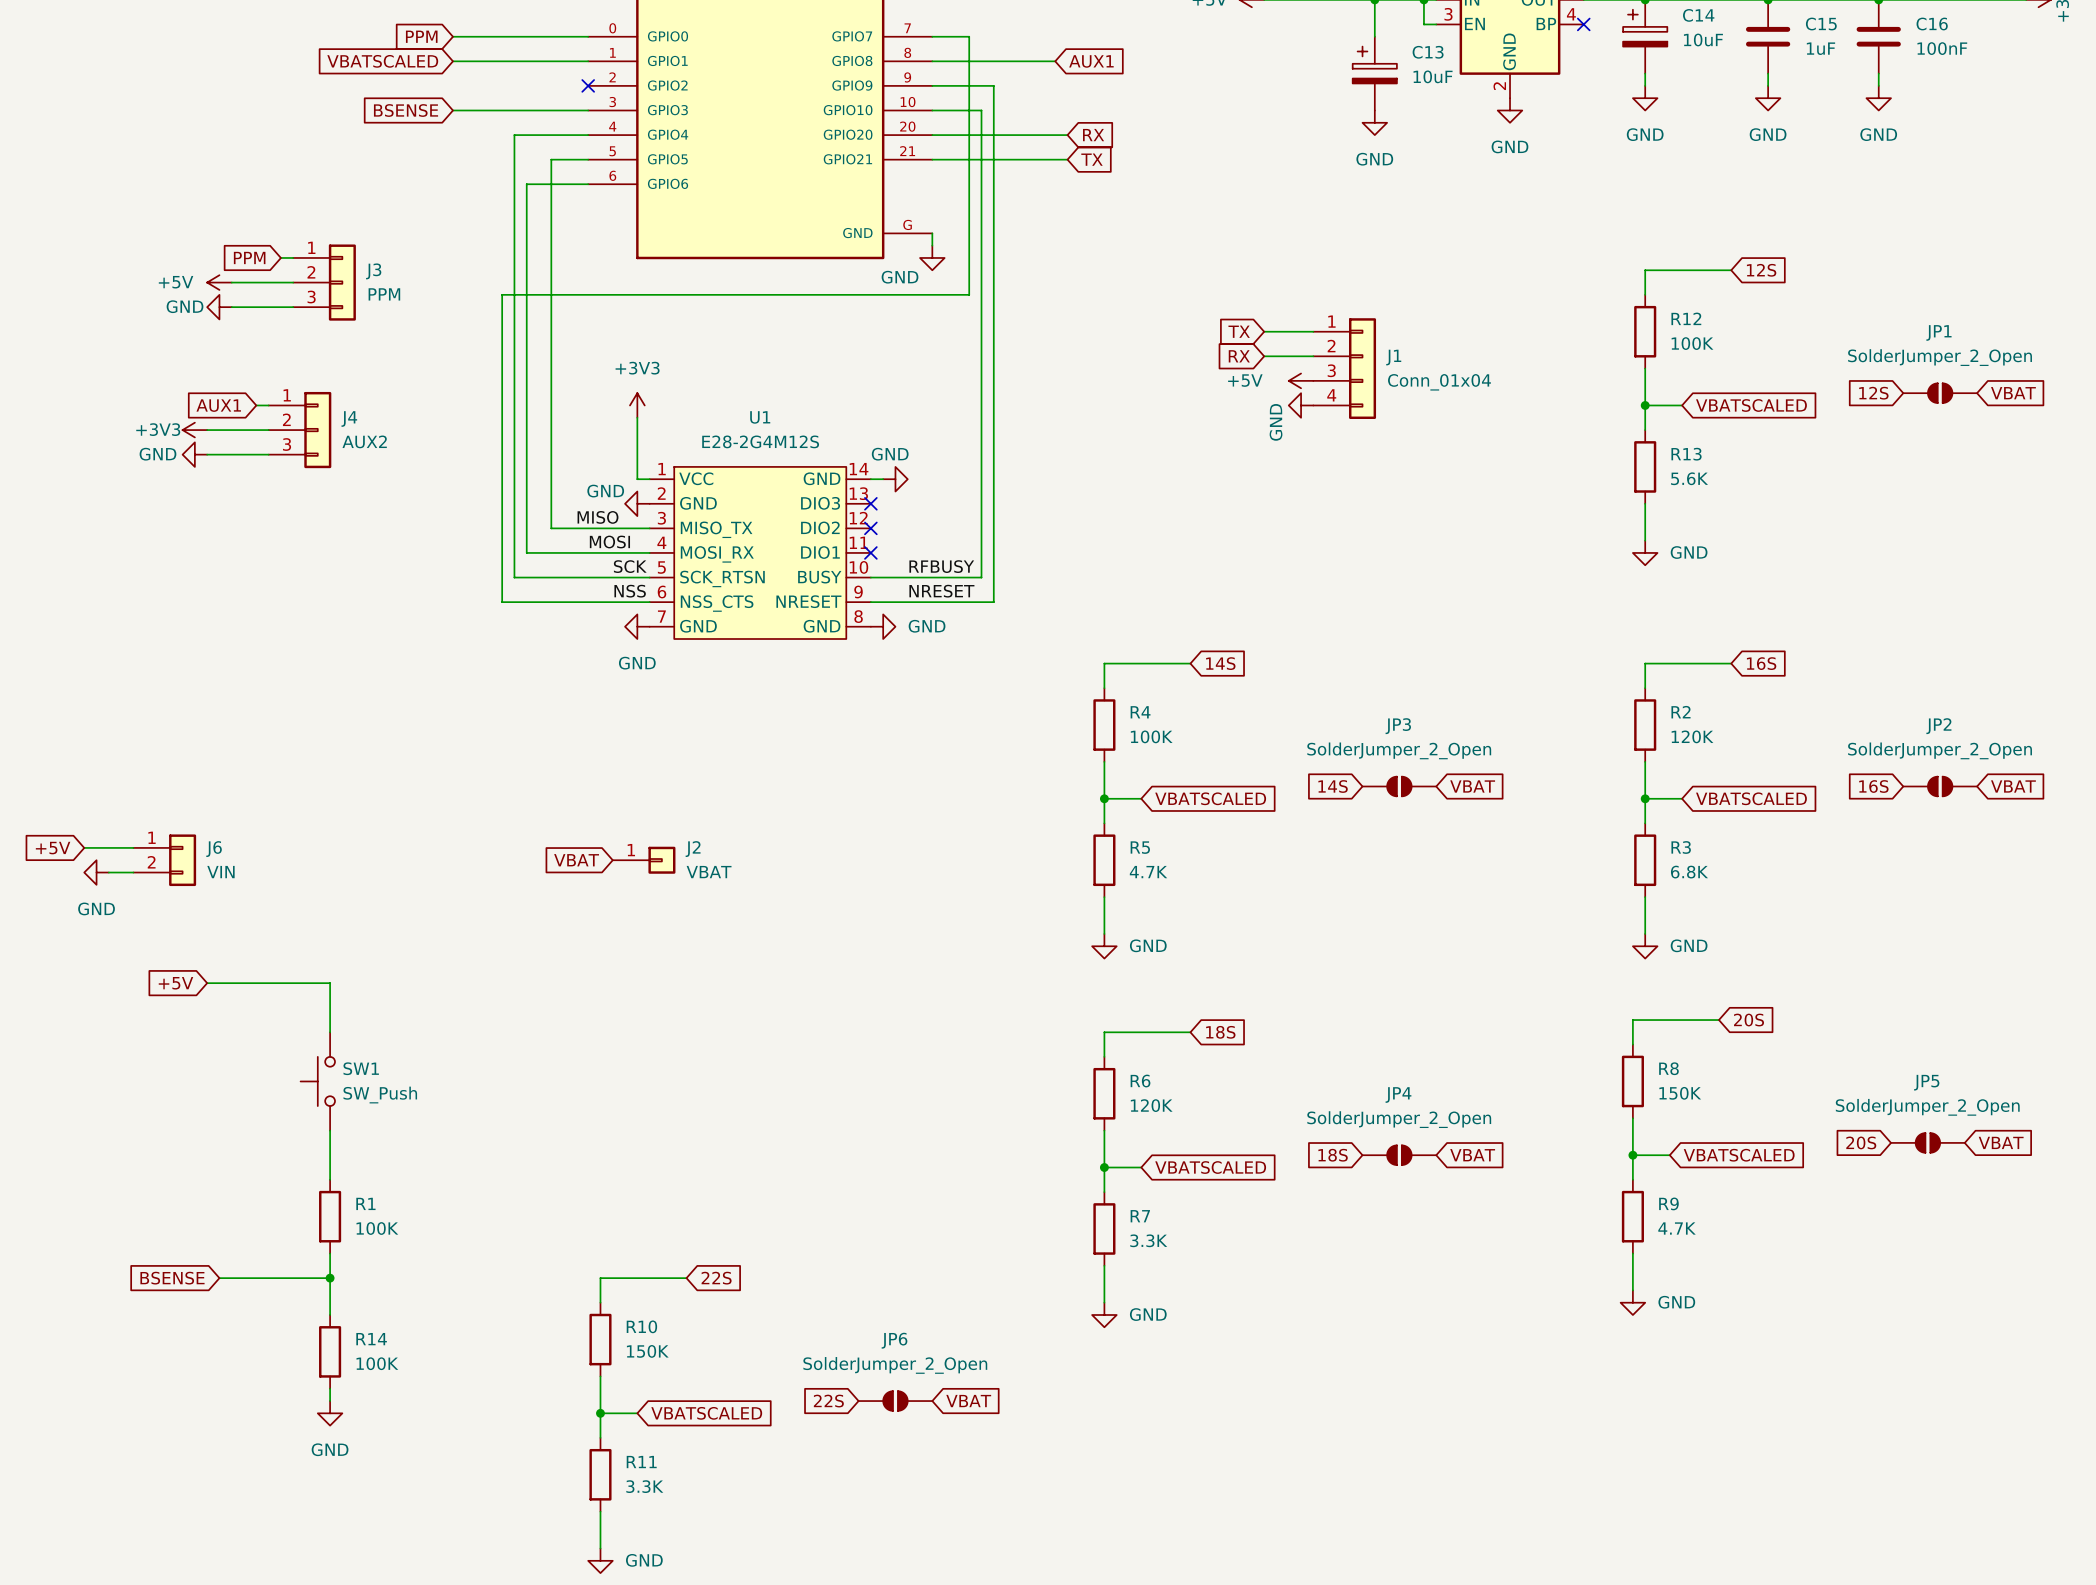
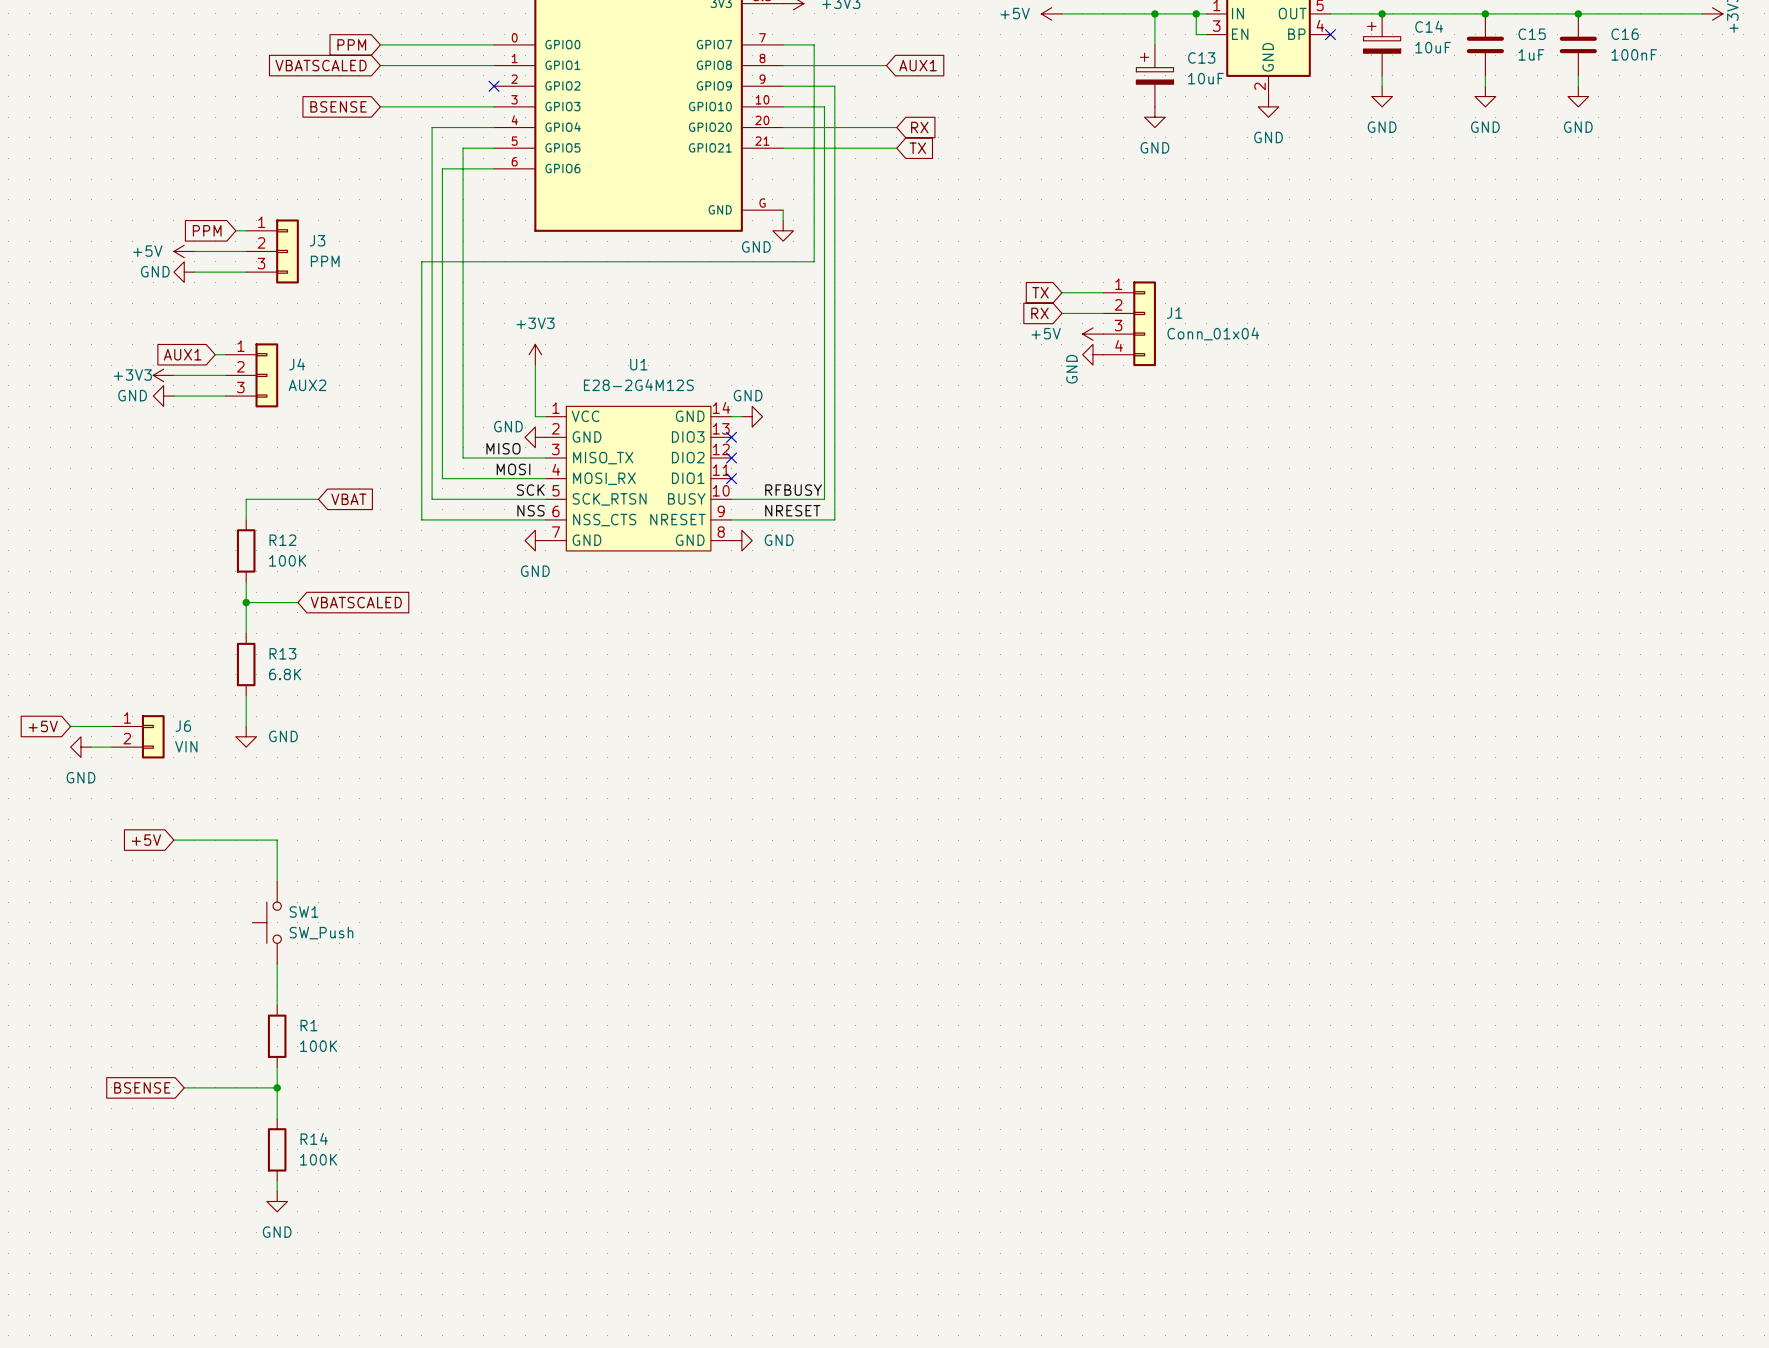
wire: (1731, 270) (1645, 270) (1645, 294) -> none
global label: 12S (1761, 270) -> none
R12 position: (1645, 331) -> (246, 550)
wire: (1645, 368) (1645, 430) -> none
global label: 12S (1873, 393) -> none
JP1: SolderJumper_2_Open (1940, 393) -> none
global label: VBAT (2013, 393) -> none
wire: (1645, 405) (1682, 405) -> none
junction: (1645, 405) -> none
global label: VBATSCALED (1751, 405) -> none
R13 position: (1645, 466) -> (246, 664)
R13 value: 5.6K (1689, 478) -> 6.8K (285, 674)
wire: (1645, 503) (1645, 540) -> none
power symbol: GND (1645, 552) -> none
wire: none -> (318, 499) (246, 499) (246, 519)
global label: none -> VBAT (348, 499)
wire: (1190, 663) (1104, 663) (1104, 688) -> none
global label: 14S (1220, 663) -> none
wire: (1731, 663) (1645, 663) (1645, 688) -> none
global label: 16S (1761, 663) -> none
wire: none -> (246, 581) (246, 633)
wire: none -> (246, 602) (297, 602)
junction: none -> (246, 602)
global label: none -> VBATSCALED (356, 602)
R4: 100K (1104, 725) -> none
R2: 120K (1645, 725) -> none
wire: (1104, 761) (1104, 823) -> none
wire: (1645, 761) (1645, 823) -> none
global label: 14S (1333, 786) -> none
JP3: SolderJumper_2_Open (1399, 786) -> none
global label: VBAT (1472, 786) -> none
global label: 16S (1873, 786) -> none
JP2: SolderJumper_2_Open (1940, 786) -> none
global label: VBAT (2013, 786) -> none
wire: (1104, 798) (1141, 798) -> none
junction: (1104, 798) -> none
global label: VBATSCALED (1210, 798) -> none
wire: (1645, 798) (1682, 798) -> none
junction: (1645, 798) -> none
global label: VBATSCALED (1751, 798) -> none
wire: none -> (246, 695) (246, 726)
power symbol: none -> GND (246, 736)
global label: VBAT (576, 860) -> none
J2: VBAT (644, 860) -> none
R5: 4.7K (1104, 860) -> none
R3: 6.8K (1645, 860) -> none
wire: (1104, 897) (1104, 933) -> none
wire: (1645, 897) (1645, 933) -> none
power symbol: GND (1104, 946) -> none
power symbol: GND (1645, 946) -> none
wire: (1718, 1020) (1632, 1020) (1632, 1044) -> none
global label: 20S (1749, 1020) -> none
wire: (1190, 1032) (1104, 1032) (1104, 1056) -> none
global label: 18S (1220, 1032) -> none
R8: 150K (1632, 1081) -> none
R6: 120K (1104, 1093) -> none
wire: (1632, 1118) (1632, 1179) -> none
wire: (1104, 1130) (1104, 1192) -> none
global label: 20S (1861, 1142) -> none
JP5: SolderJumper_2_Open (1927, 1142) -> none
global label: VBAT (2001, 1142) -> none
global label: 18S (1333, 1155) -> none
JP4: SolderJumper_2_Open (1399, 1155) -> none
global label: VBAT (1472, 1155) -> none
wire: (1632, 1155) (1669, 1155) -> none
junction: (1632, 1155) -> none
global label: VBATSCALED (1739, 1155) -> none
wire: (1104, 1167) (1141, 1167) -> none
junction: (1104, 1167) -> none
global label: VBATSCALED (1210, 1167) -> none
R9: 4.7K (1632, 1216) -> none
R7: 3.3K (1104, 1228) -> none
wire: (1632, 1253) (1632, 1290) -> none
wire: (1104, 1265) (1104, 1302) -> none
wire: (686, 1278) (600, 1278) (600, 1302) -> none
global label: 22S (716, 1278) -> none
power symbol: GND (1632, 1302) -> none
power symbol: GND (1104, 1315) -> none
R10: 150K (600, 1339) -> none
wire: (600, 1376) (600, 1437) -> none
global label: 22S (828, 1401) -> none
JP6: SolderJumper_2_Open (895, 1401) -> none
global label: VBAT (968, 1401) -> none
wire: (600, 1413) (637, 1413) -> none
junction: (600, 1413) -> none
global label: VBATSCALED (706, 1413) -> none
R11: 3.3K (600, 1474) -> none
wire: (600, 1511) (600, 1548) -> none
power symbol: GND (600, 1560) -> none

